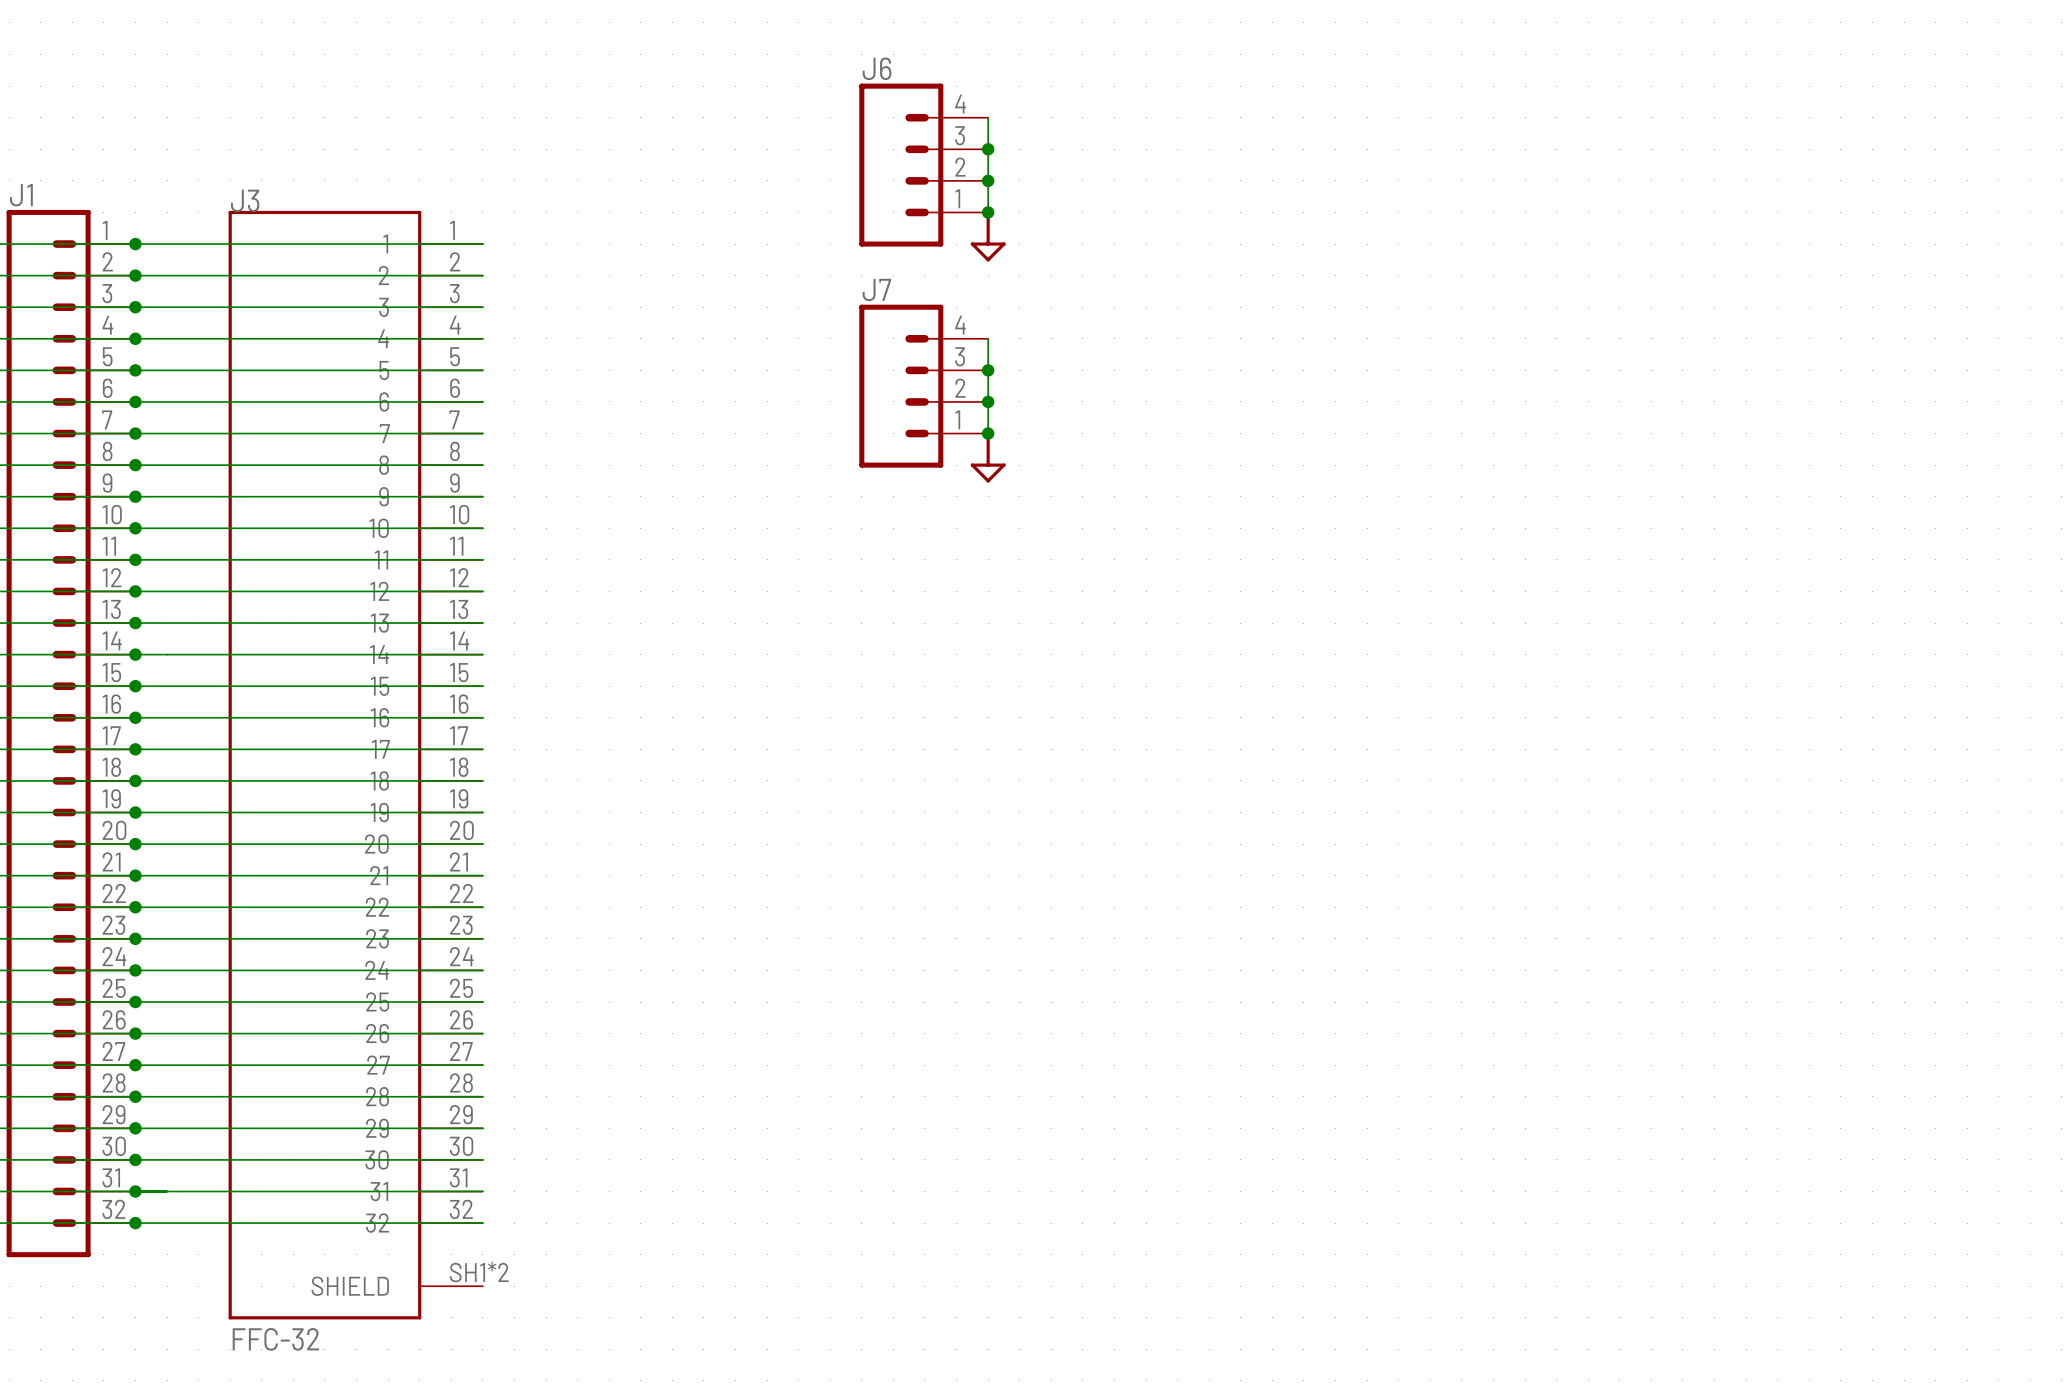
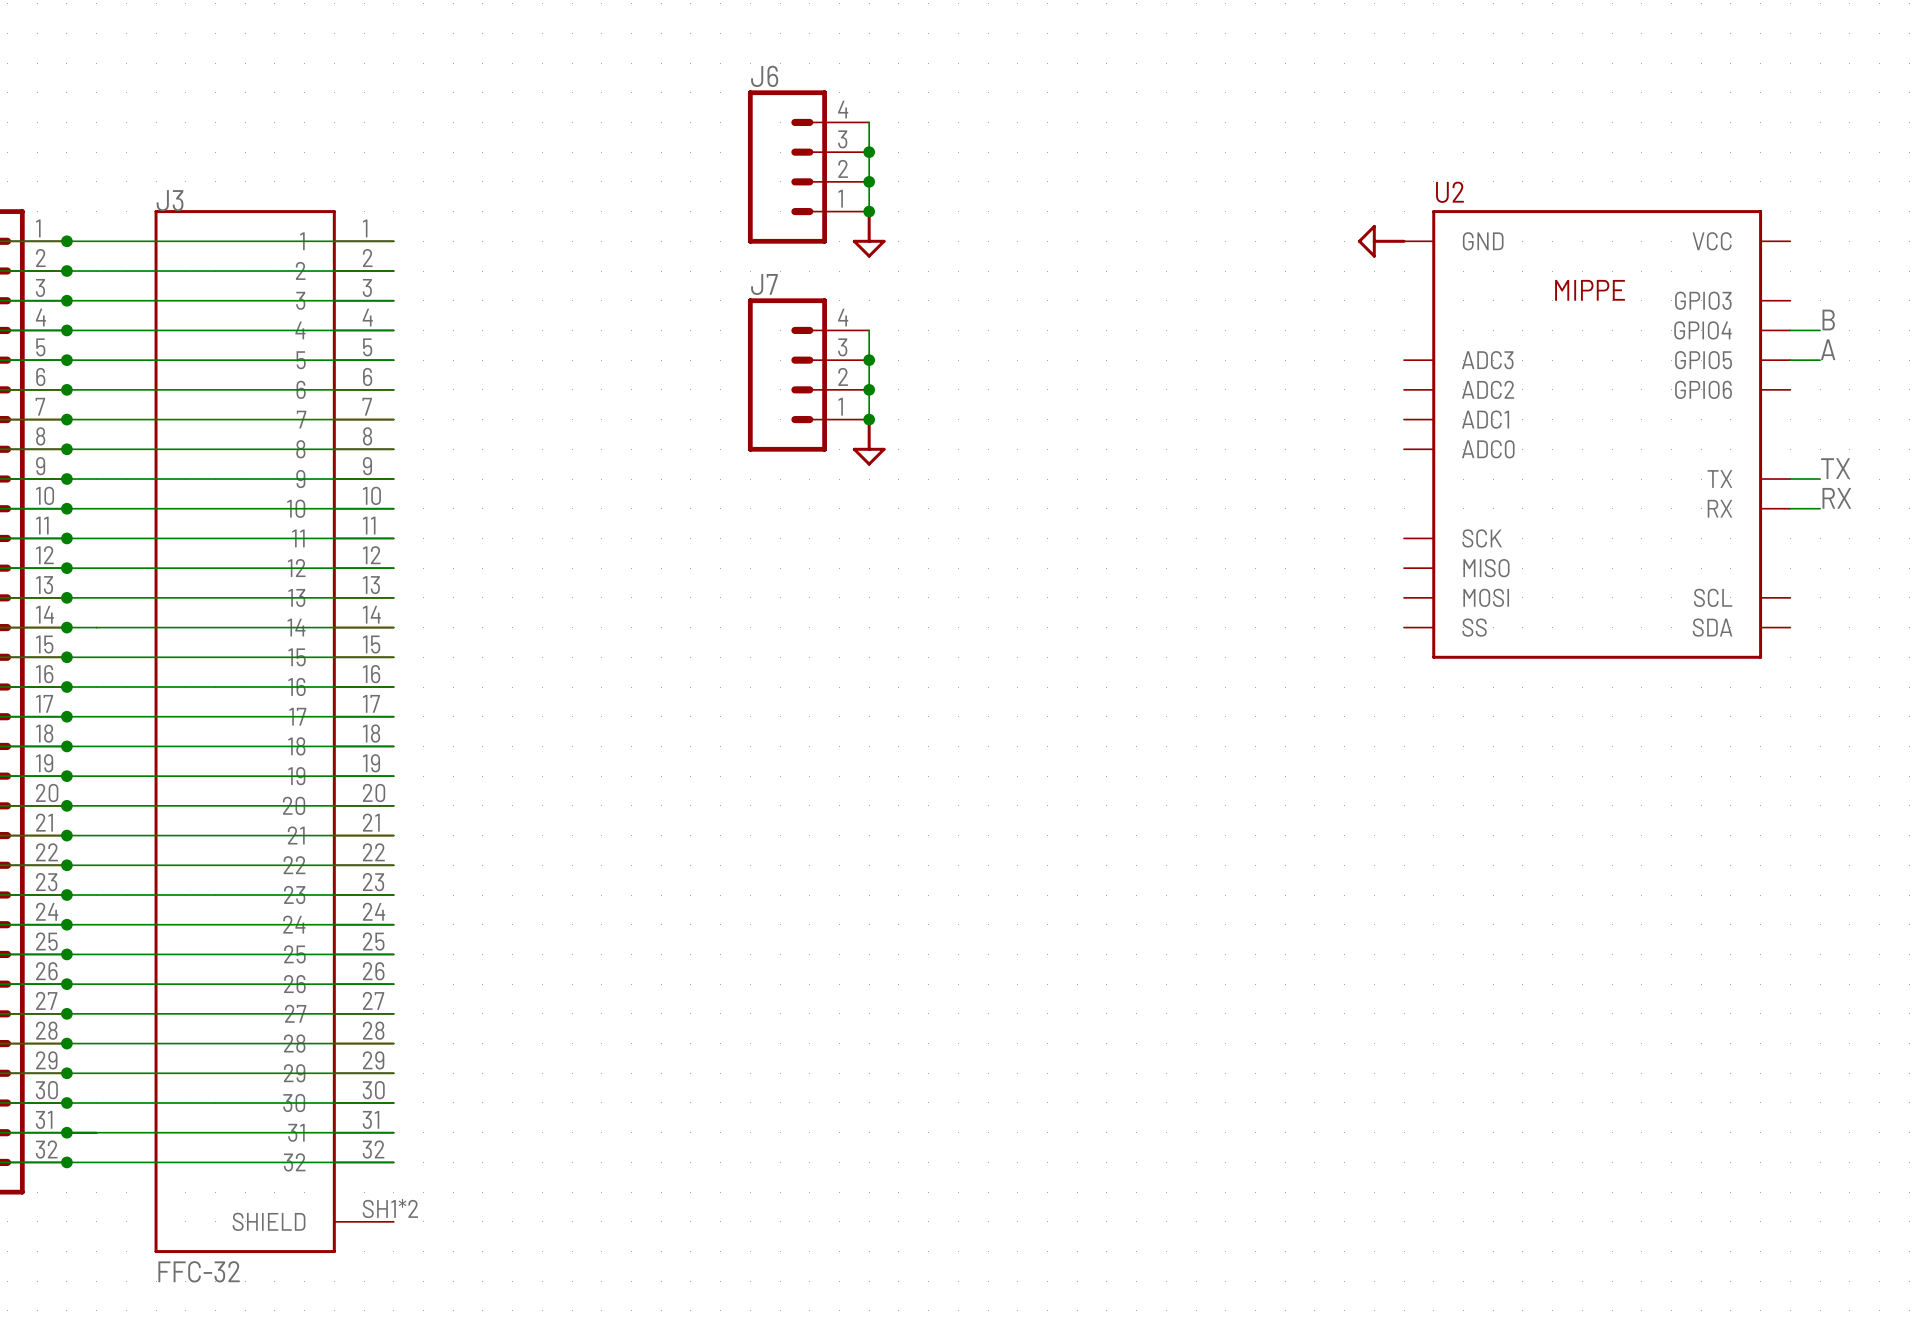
power symbol: none -> (1381, 241)
label: none -> B (1828, 320)
wire: none -> (1790, 330) (1820, 330)
label: none -> A (1828, 349)
wire: none -> (1790, 360) (1820, 360)
U2: none -> (1597, 434)
label: none -> TX (1835, 468)
wire: none -> (1790, 479) (1820, 479)
label: none -> RX (1836, 498)
wire: none -> (1790, 508) (1820, 508)

